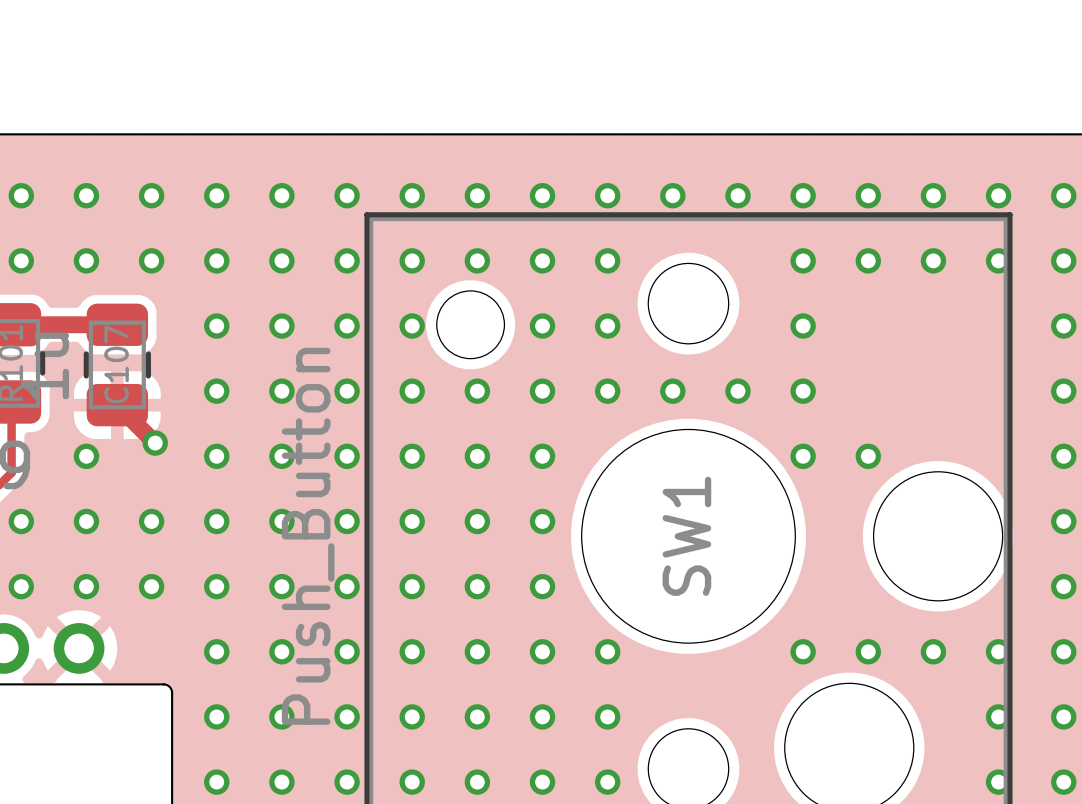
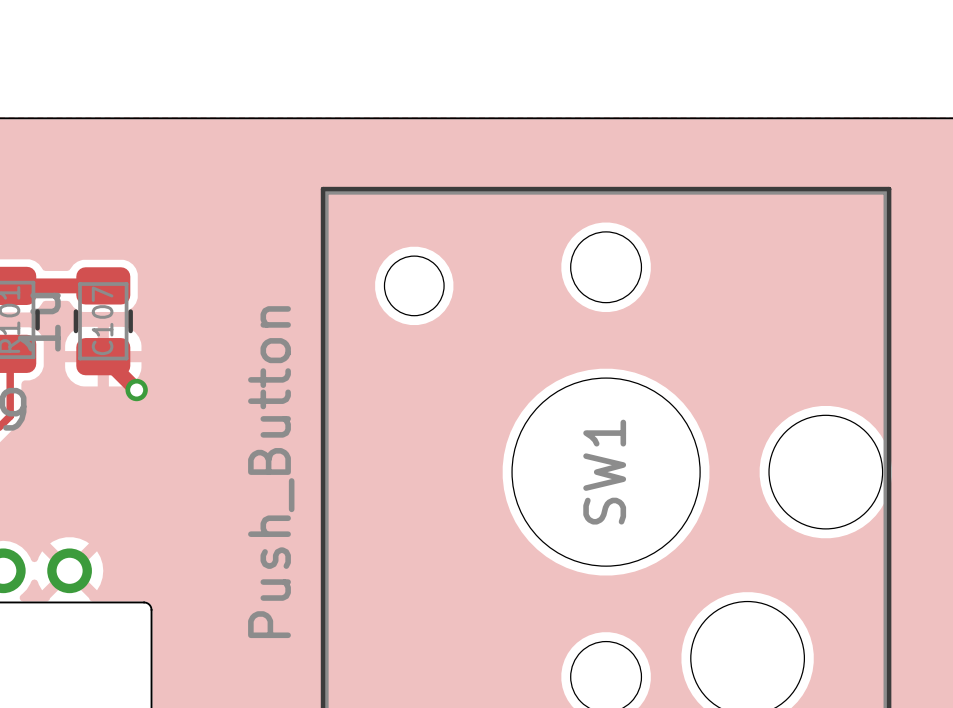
via: (21, 195) -> none
via: (86, 195) -> none
via: (151, 195) -> none
via: (216, 195) -> none
via: (281, 195) -> none
via: (347, 195) -> none
via: (412, 195) -> none
via: (477, 195) -> none
via: (542, 195) -> none
via: (607, 195) -> none
via: (672, 195) -> none
via: (737, 195) -> none
via: (803, 195) -> none
via: (868, 195) -> none
via: (933, 195) -> none
via: (998, 195) -> none
via: (1063, 195) -> none
via: (21, 260) -> none
via: (86, 260) -> none
via: (151, 260) -> none
via: (216, 260) -> none
via: (281, 260) -> none
via: (347, 260) -> none
via: (412, 260) -> none
via: (477, 260) -> none
via: (542, 260) -> none
via: (607, 260) -> none
via: (803, 260) -> none
via: (868, 260) -> none
via: (933, 260) -> none
via: (998, 260) -> none
via: (1063, 260) -> none
via: (216, 326) -> none
via: (281, 326) -> none
via: (347, 326) -> none
via: (412, 326) -> none
via: (542, 326) -> none
via: (607, 326) -> none
via: (803, 326) -> none
via: (1063, 326) -> none
via: (216, 391) -> none
via: (281, 391) -> none
via: (347, 391) -> none
via: (412, 391) -> none
via: (477, 391) -> none
via: (542, 391) -> none
via: (607, 391) -> none
via: (672, 391) -> none
via: (737, 391) -> none
via: (803, 391) -> none
via: (1063, 391) -> none
via: (86, 456) -> none
via: (216, 456) -> none
via: (281, 456) -> none
via: (347, 456) -> none
via: (412, 456) -> none
via: (477, 456) -> none
via: (542, 456) -> none
via: (803, 456) -> none
via: (868, 456) -> none
via: (1063, 456) -> none
via: (21, 521) -> none
via: (86, 521) -> none
via: (151, 521) -> none
via: (216, 521) -> none
via: (281, 521) -> none
via: (347, 521) -> none
via: (412, 521) -> none
via: (477, 521) -> none
via: (542, 521) -> none
via: (1063, 521) -> none
via: (21, 586) -> none
via: (86, 586) -> none
via: (151, 586) -> none
via: (216, 586) -> none
via: (281, 586) -> none
via: (347, 586) -> none
via: (412, 586) -> none
via: (477, 586) -> none
via: (542, 586) -> none
via: (1063, 586) -> none
via: (216, 651) -> none
via: (281, 651) -> none
via: (347, 651) -> none
via: (412, 651) -> none
via: (477, 651) -> none
via: (542, 651) -> none
via: (607, 651) -> none
via: (803, 651) -> none
via: (868, 651) -> none
via: (933, 651) -> none
via: (998, 651) -> none
via: (1063, 651) -> none
via: (216, 716) -> none
via: (281, 716) -> none
via: (347, 716) -> none
via: (412, 716) -> none
via: (477, 716) -> none
via: (542, 716) -> none
via: (607, 716) -> none
via: (998, 716) -> none
via: (1063, 716) -> none
via: (216, 782) -> none
via: (281, 782) -> none
via: (347, 782) -> none
via: (412, 782) -> none
via: (477, 782) -> none
via: (542, 782) -> none
via: (607, 782) -> none
via: (998, 782) -> none
via: (1063, 782) -> none

